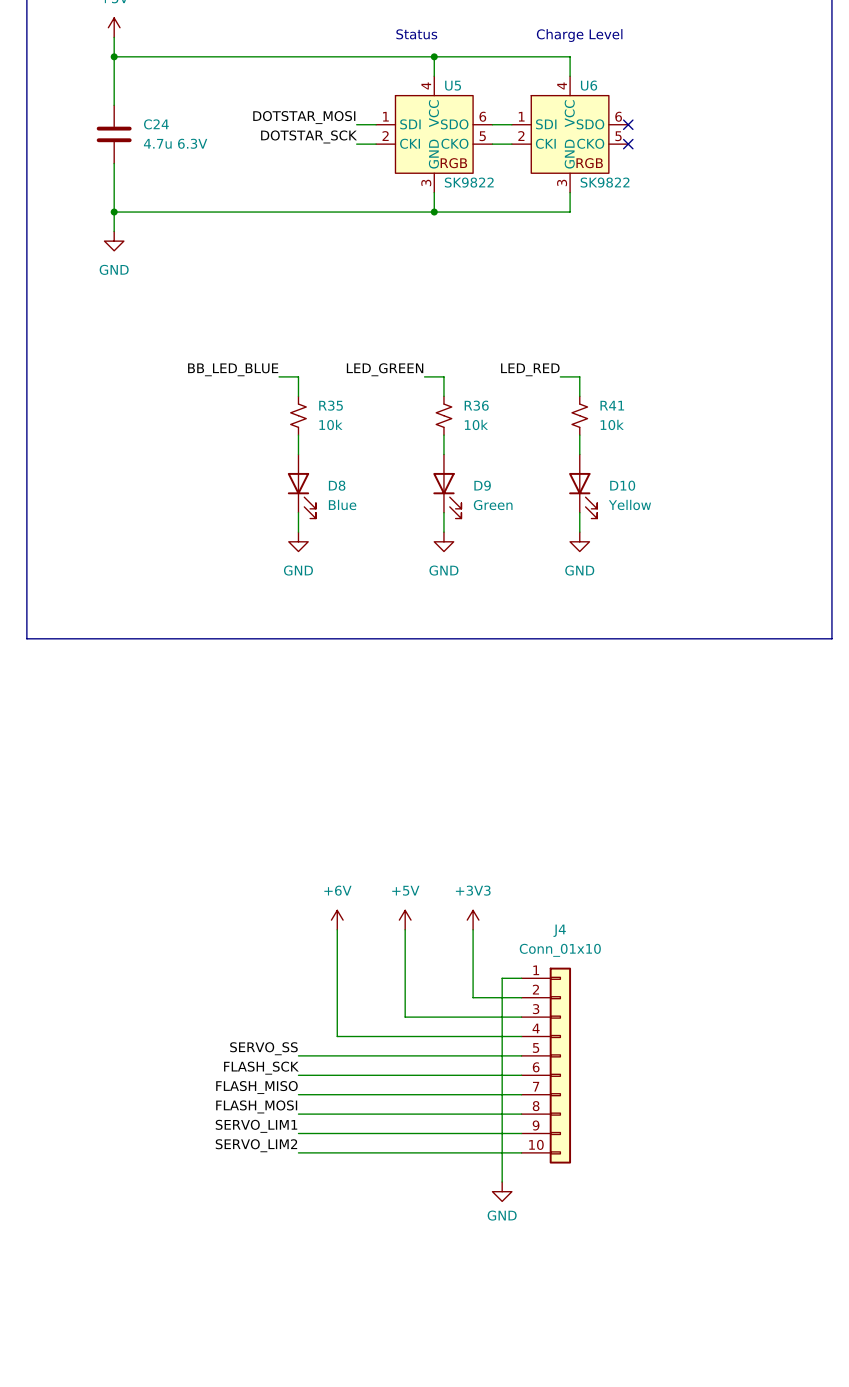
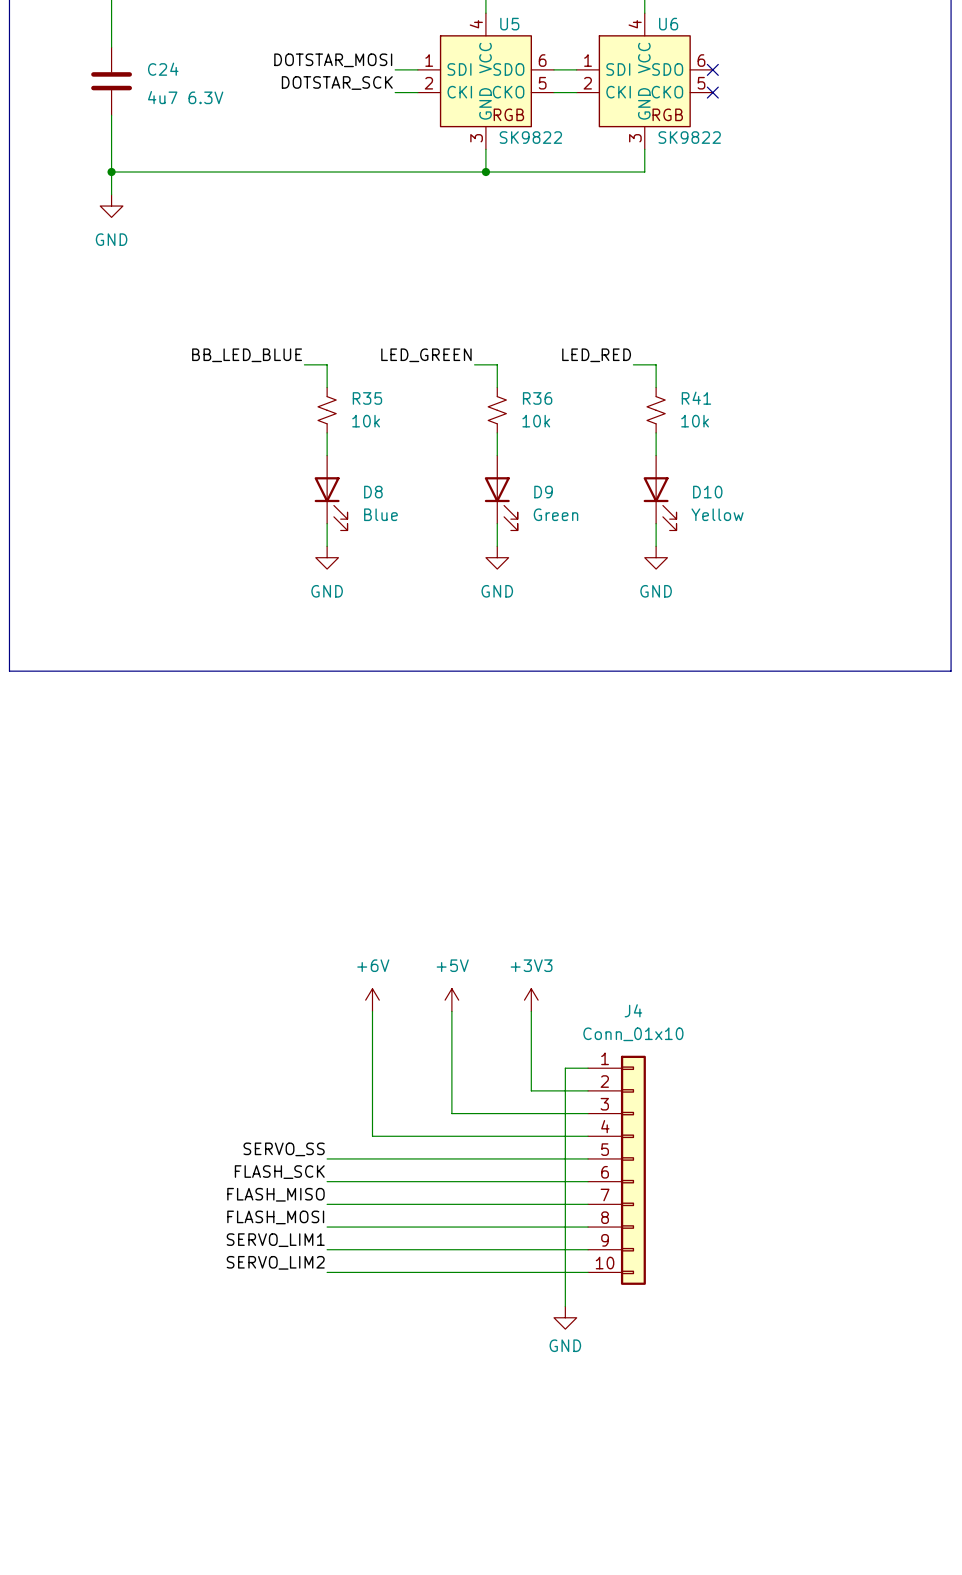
C24 value: 4.7u 6.3V (175, 143) -> 4u7 6.3V (185, 97)

